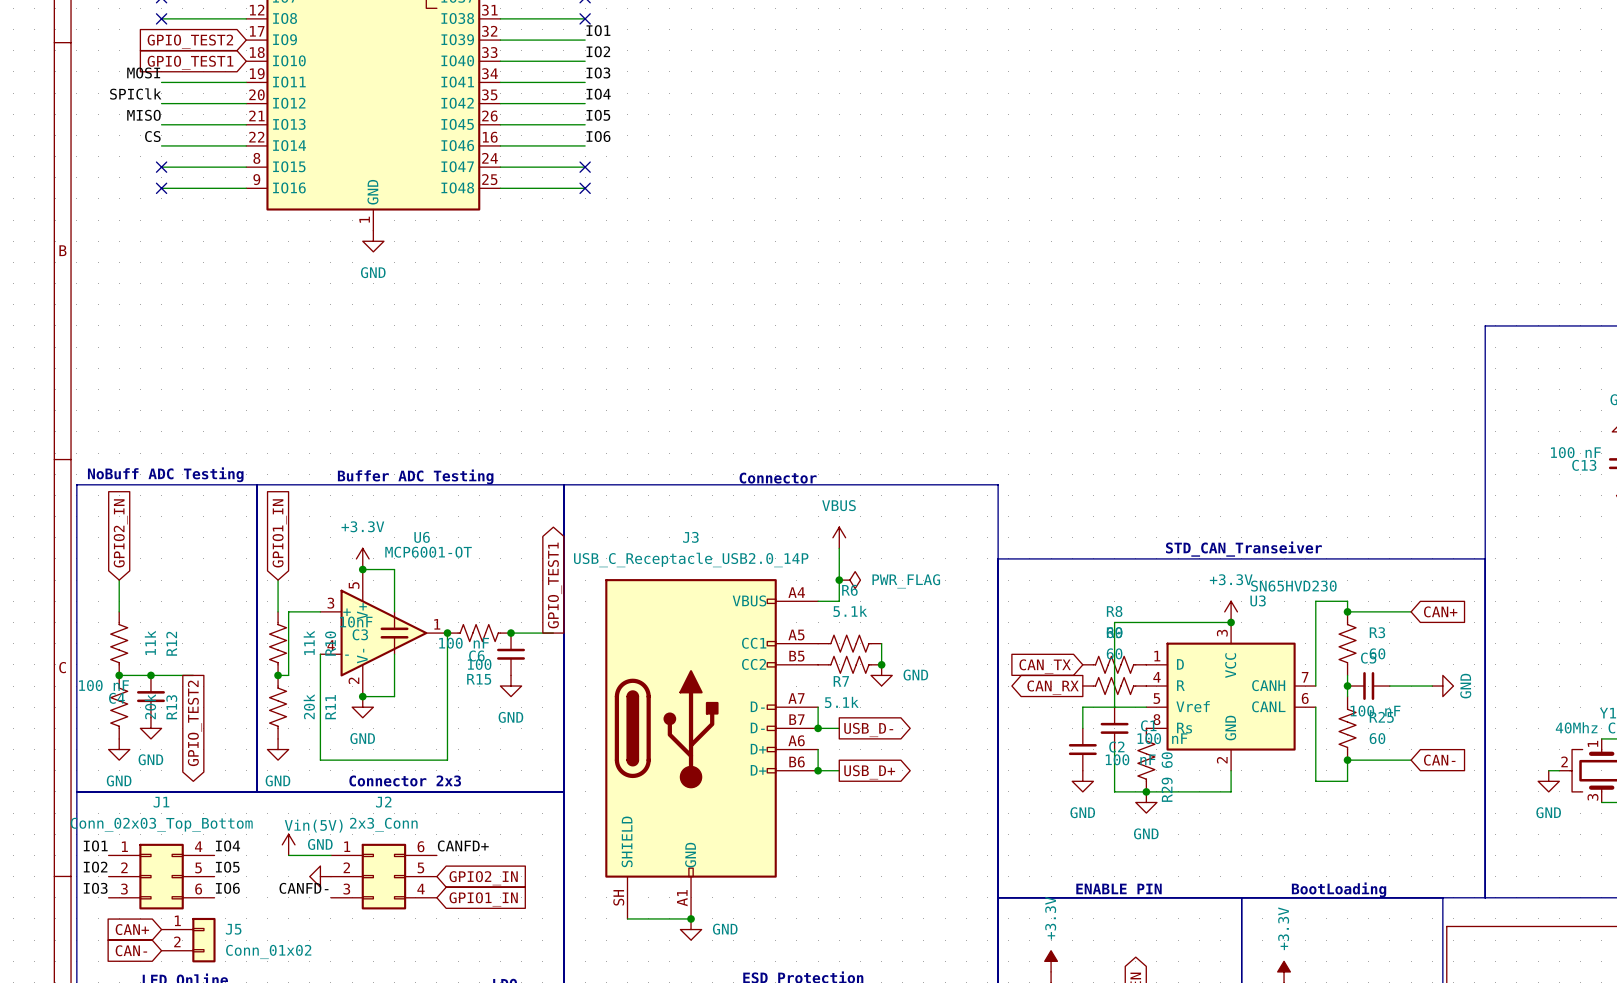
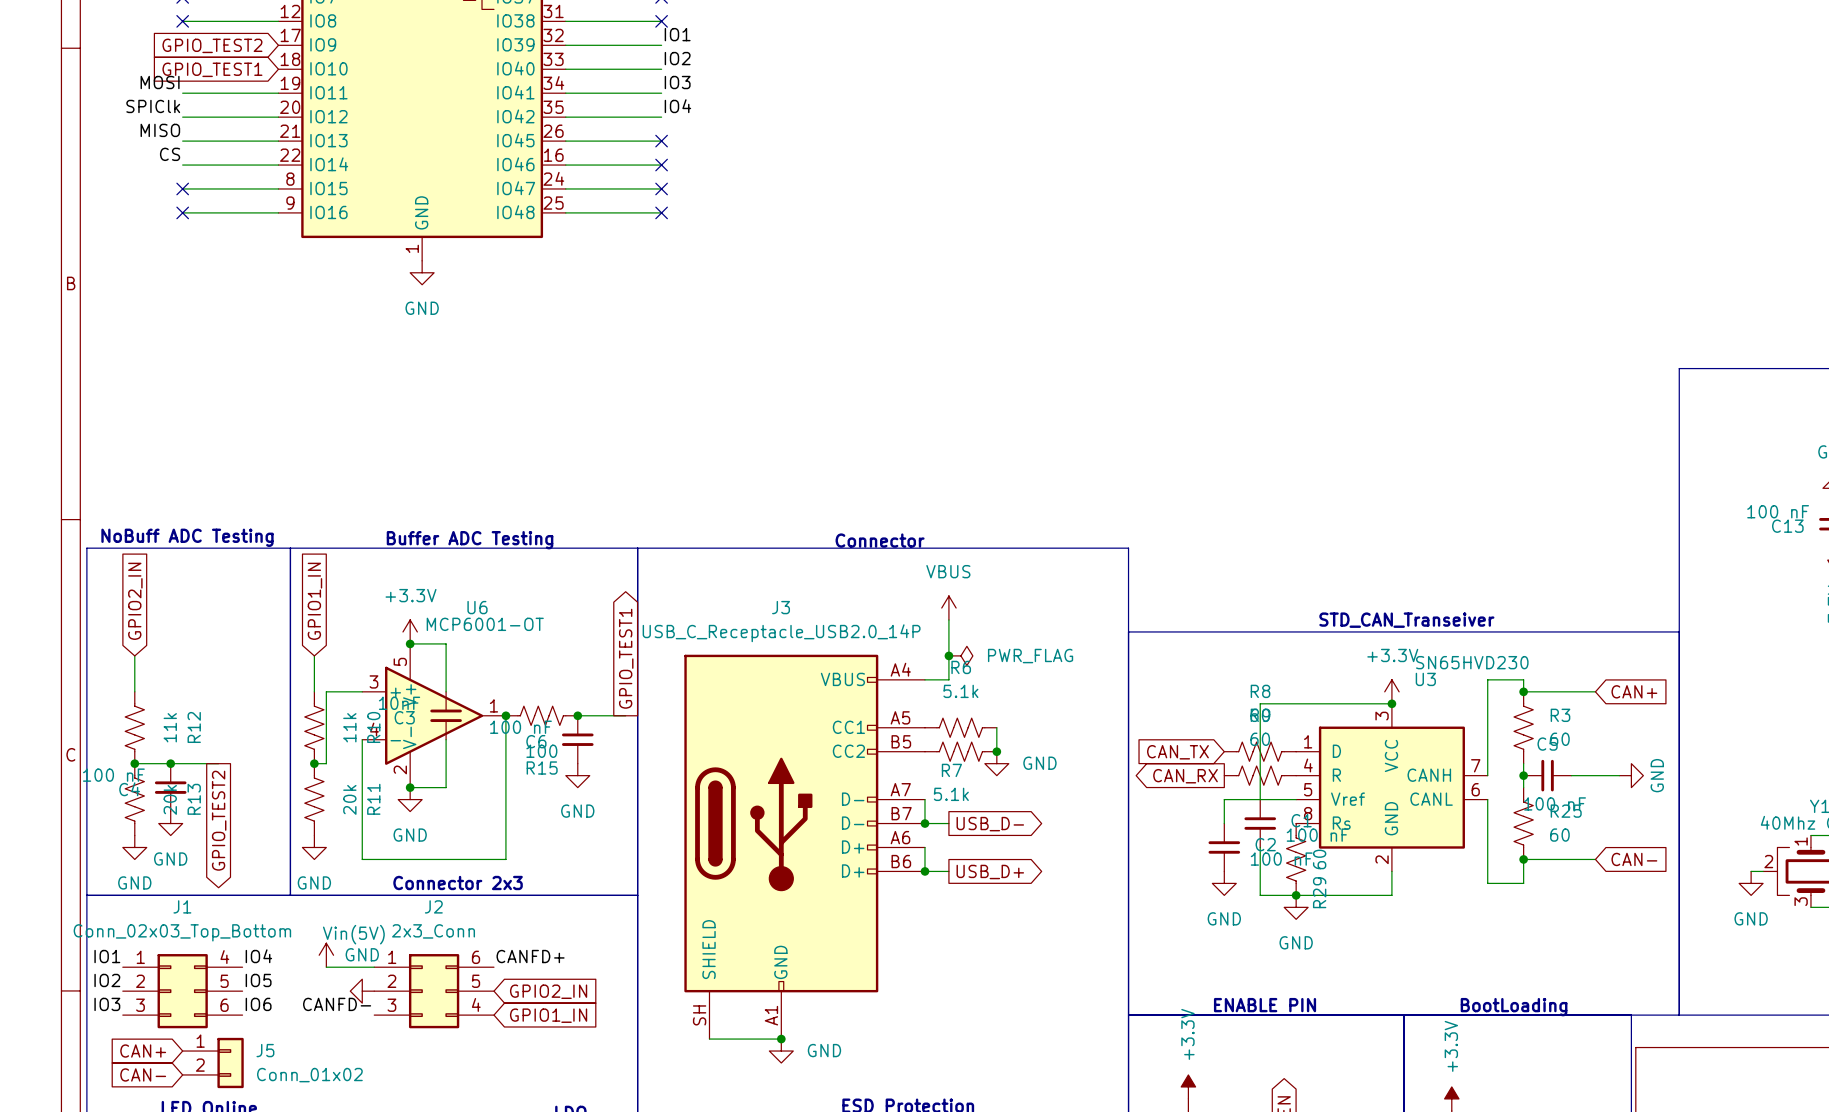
label: IO5 (598, 115) -> none
no-connect mark: none -> (661, 141)
label: IO6 (598, 136) -> none
no-connect mark: none -> (661, 165)

